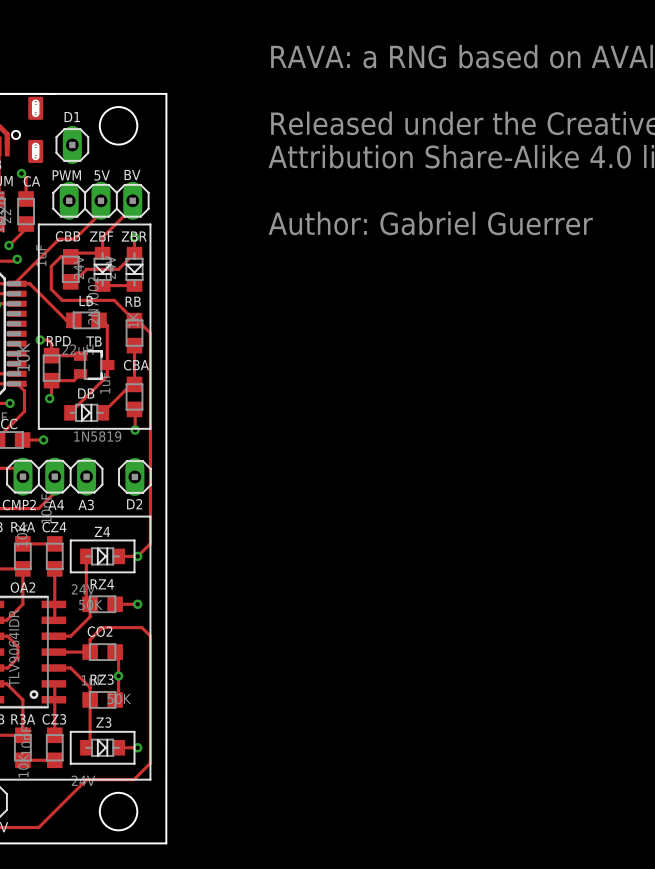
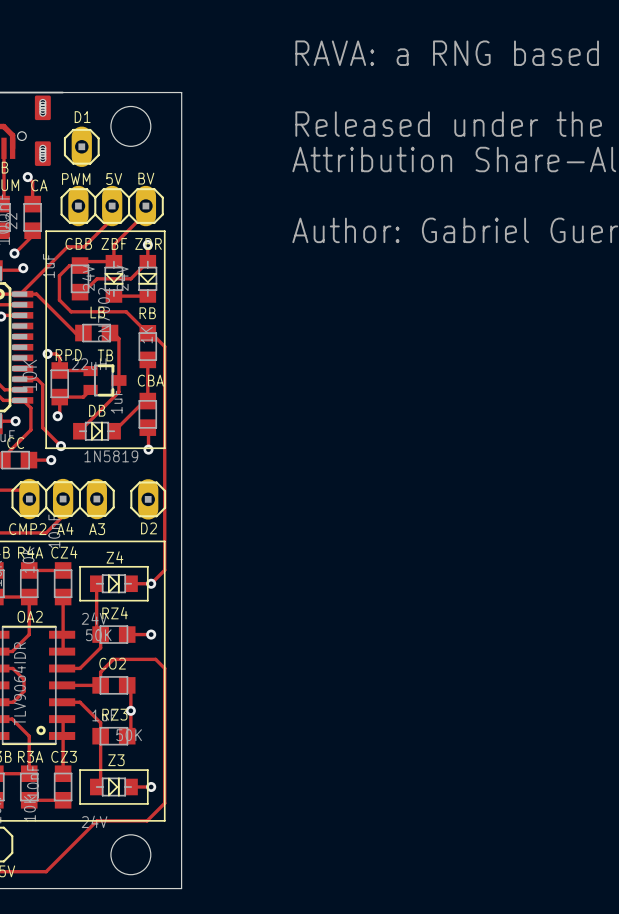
track: none -> (23, 379) (37, 379) (42, 384) (42, 427) (60, 446)
via: none -> (60, 446)

